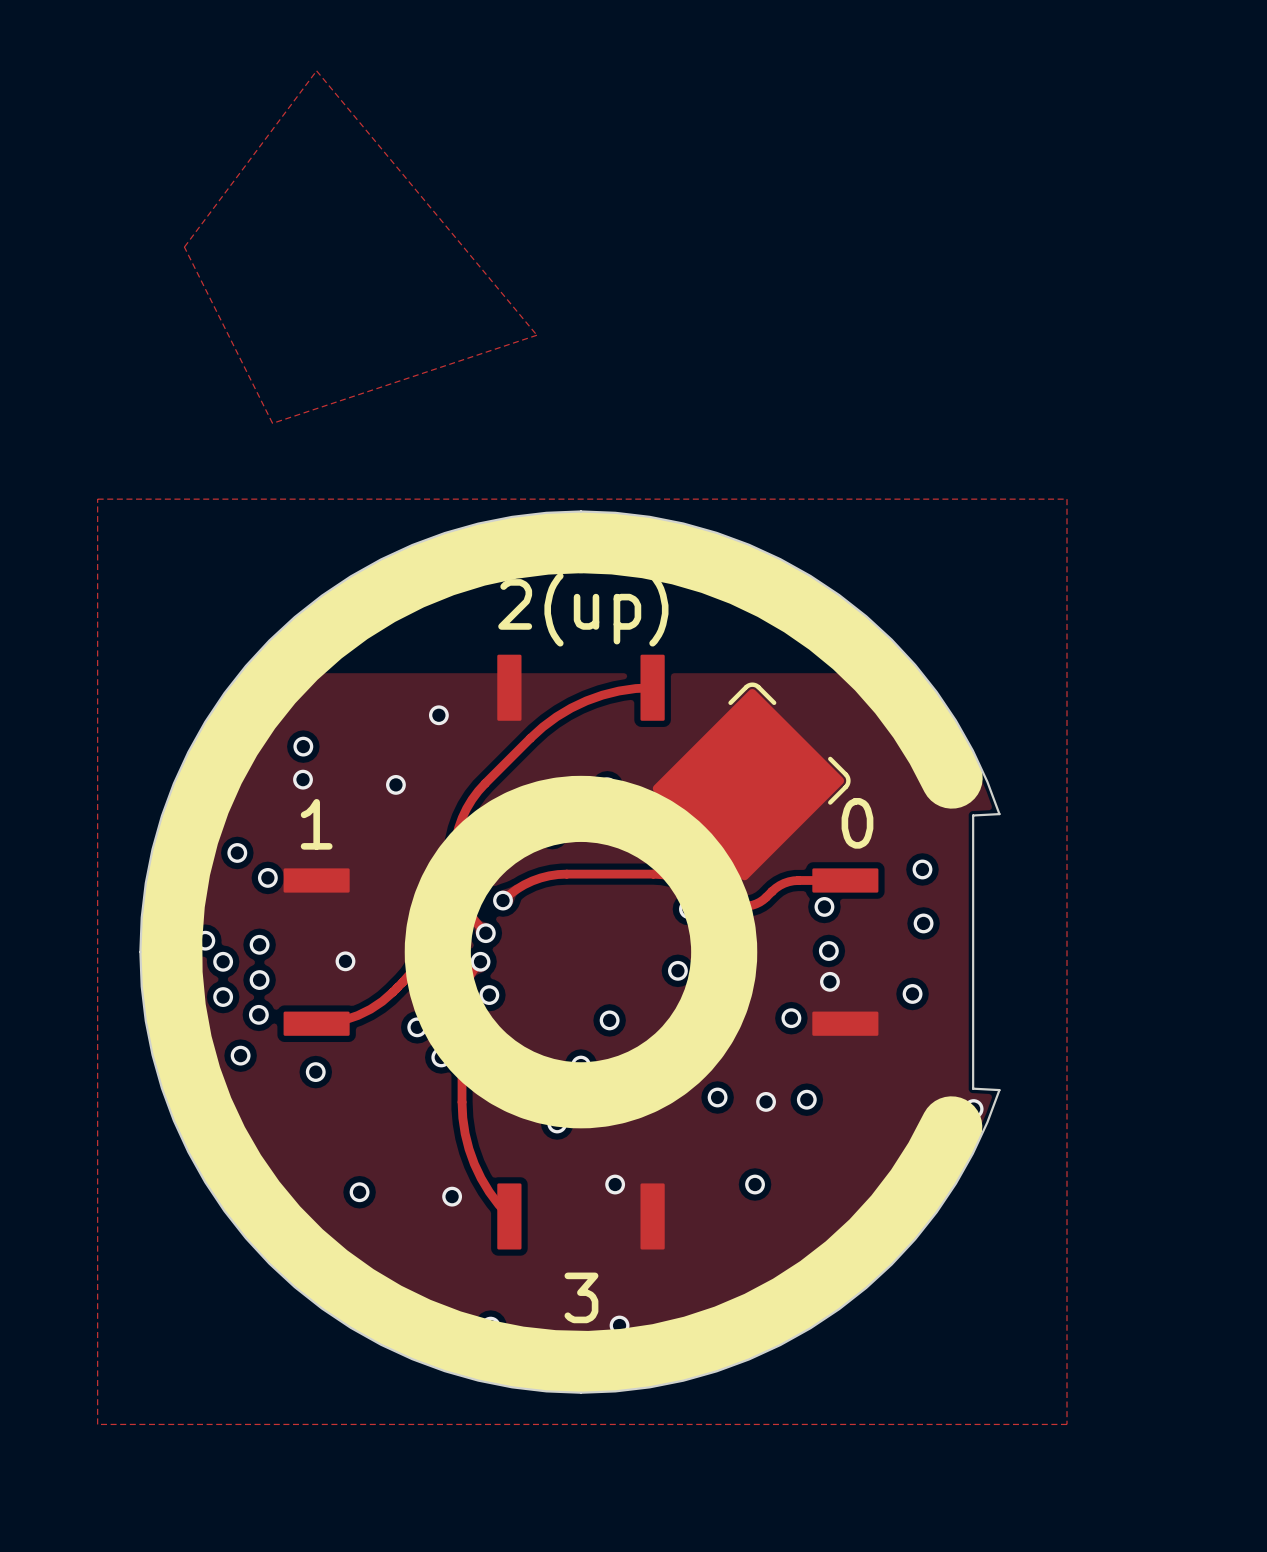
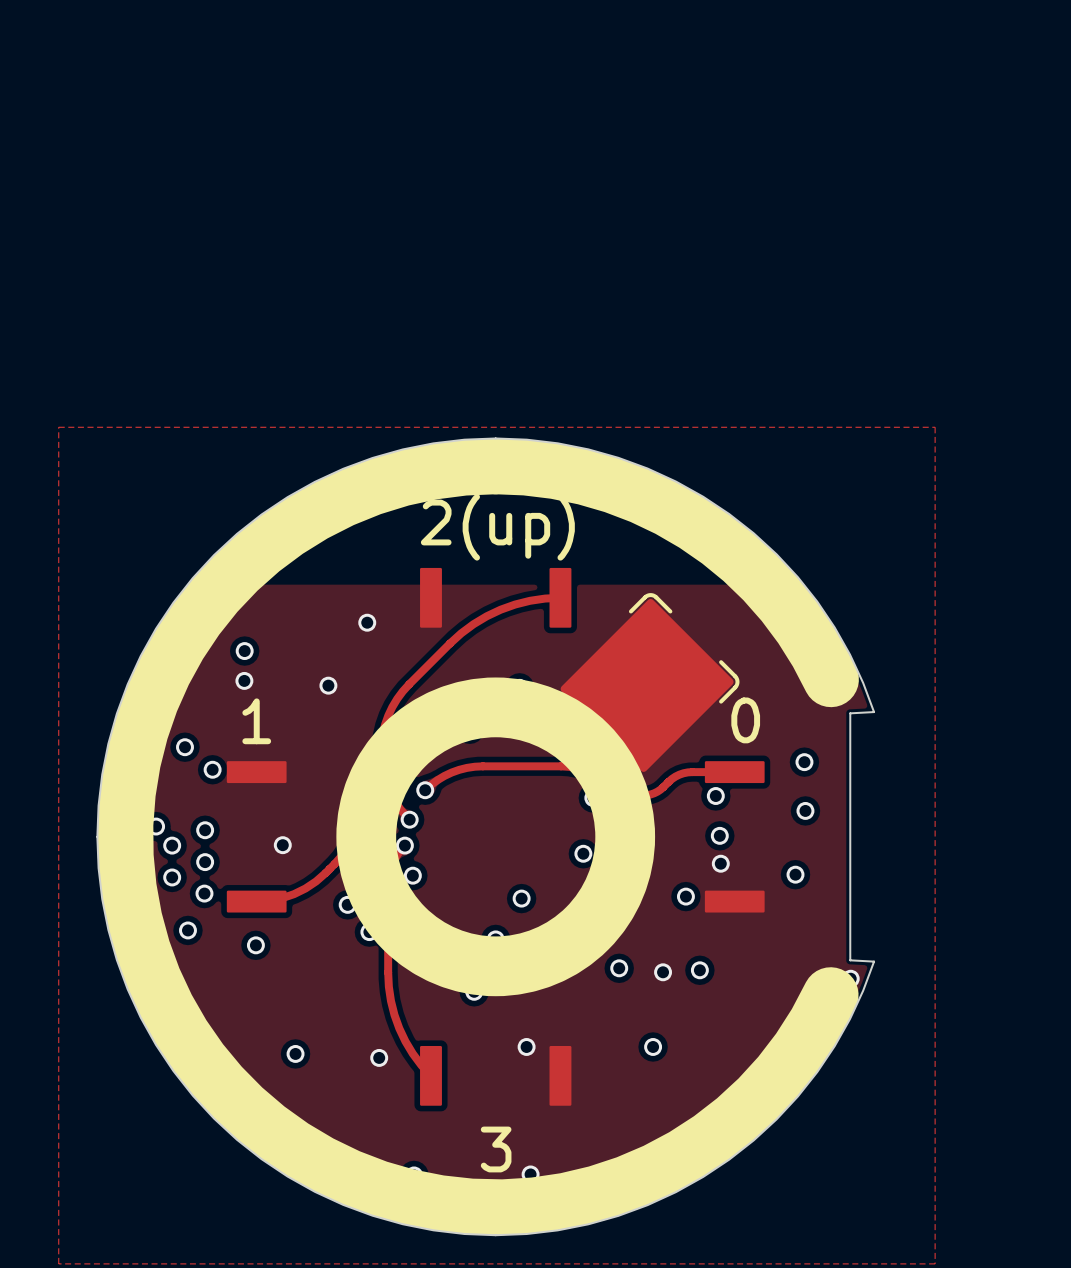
zone outline: (316, 70) (184, 247) (272, 423) (536, 335) (316, 70) -> none

